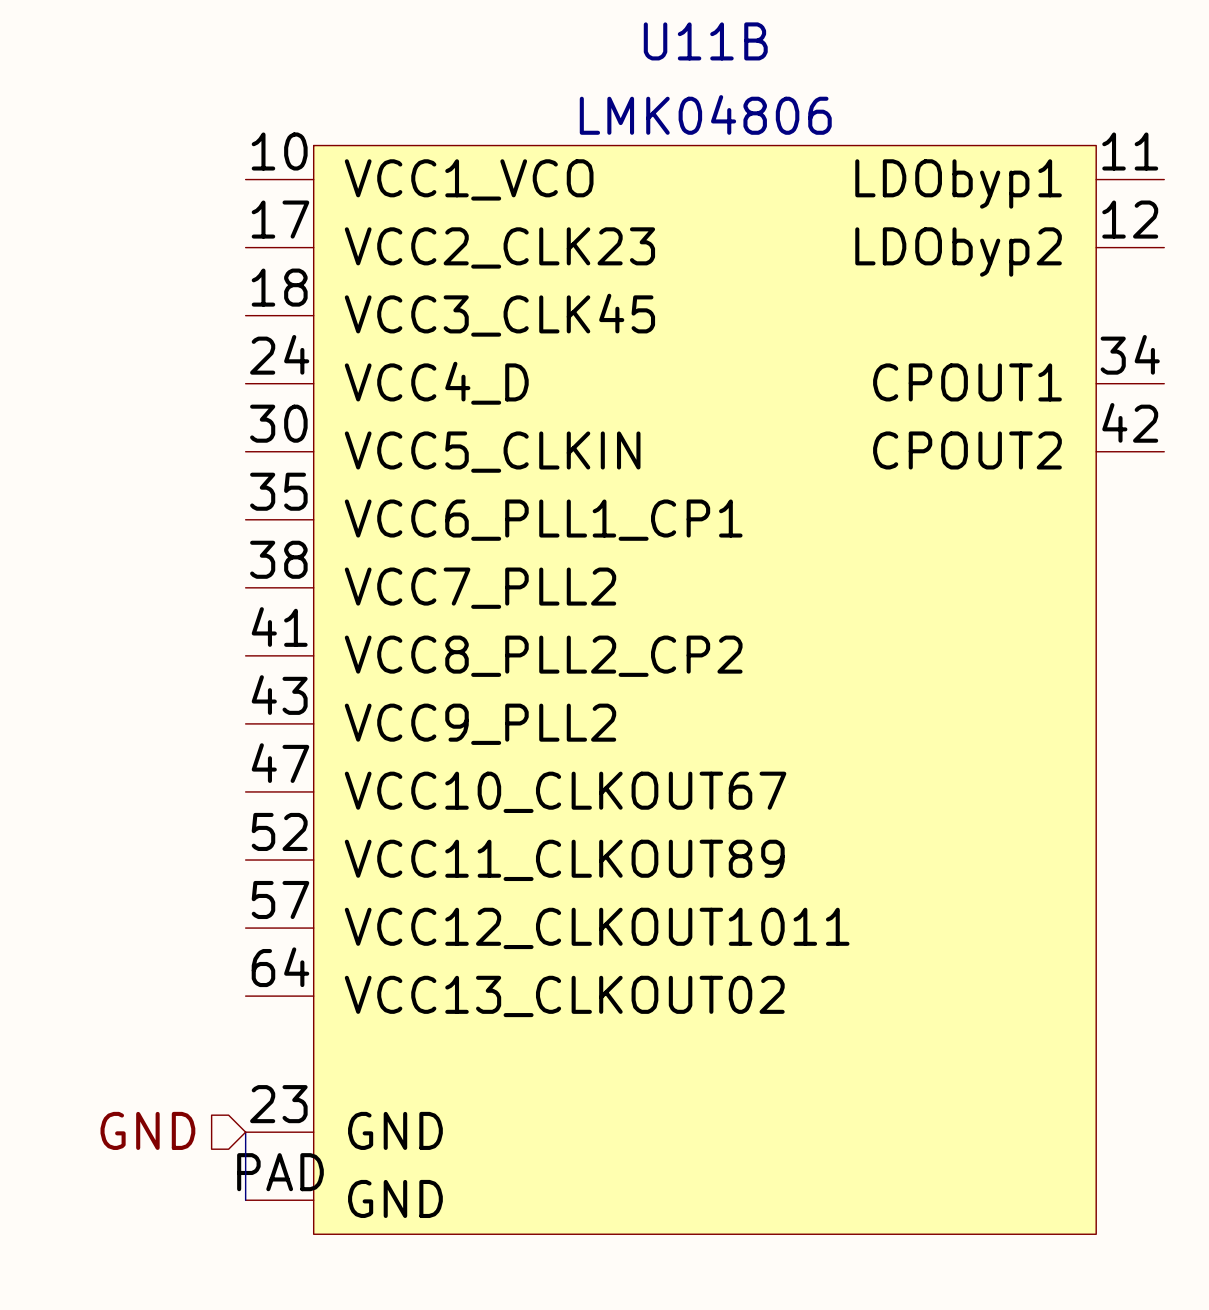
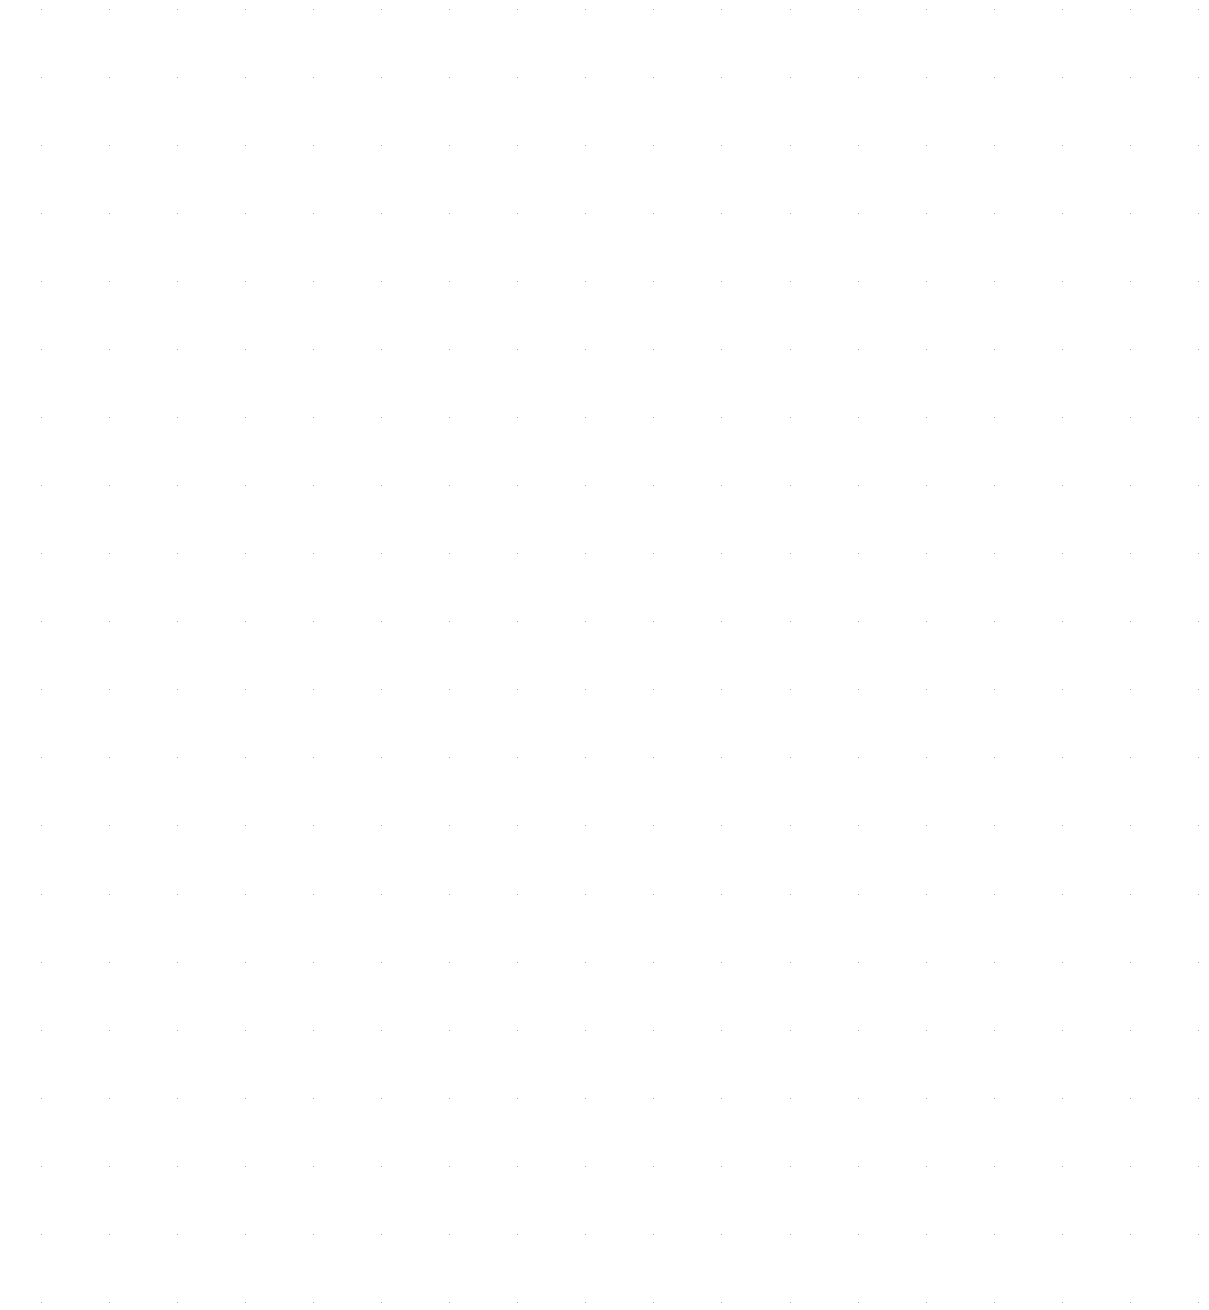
U11B: LMK04806 (704, 689) -> none
hierarchical label: GND (147, 1130) -> none
wire: (245, 1132) (245, 1200) -> none

